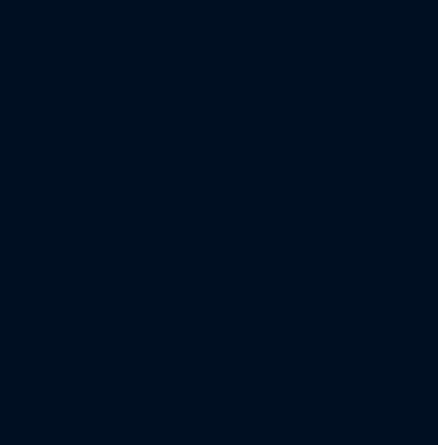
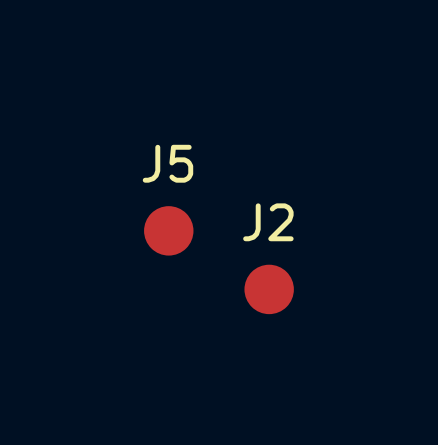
J5: none -> (168, 230)
J2: none -> (269, 289)

